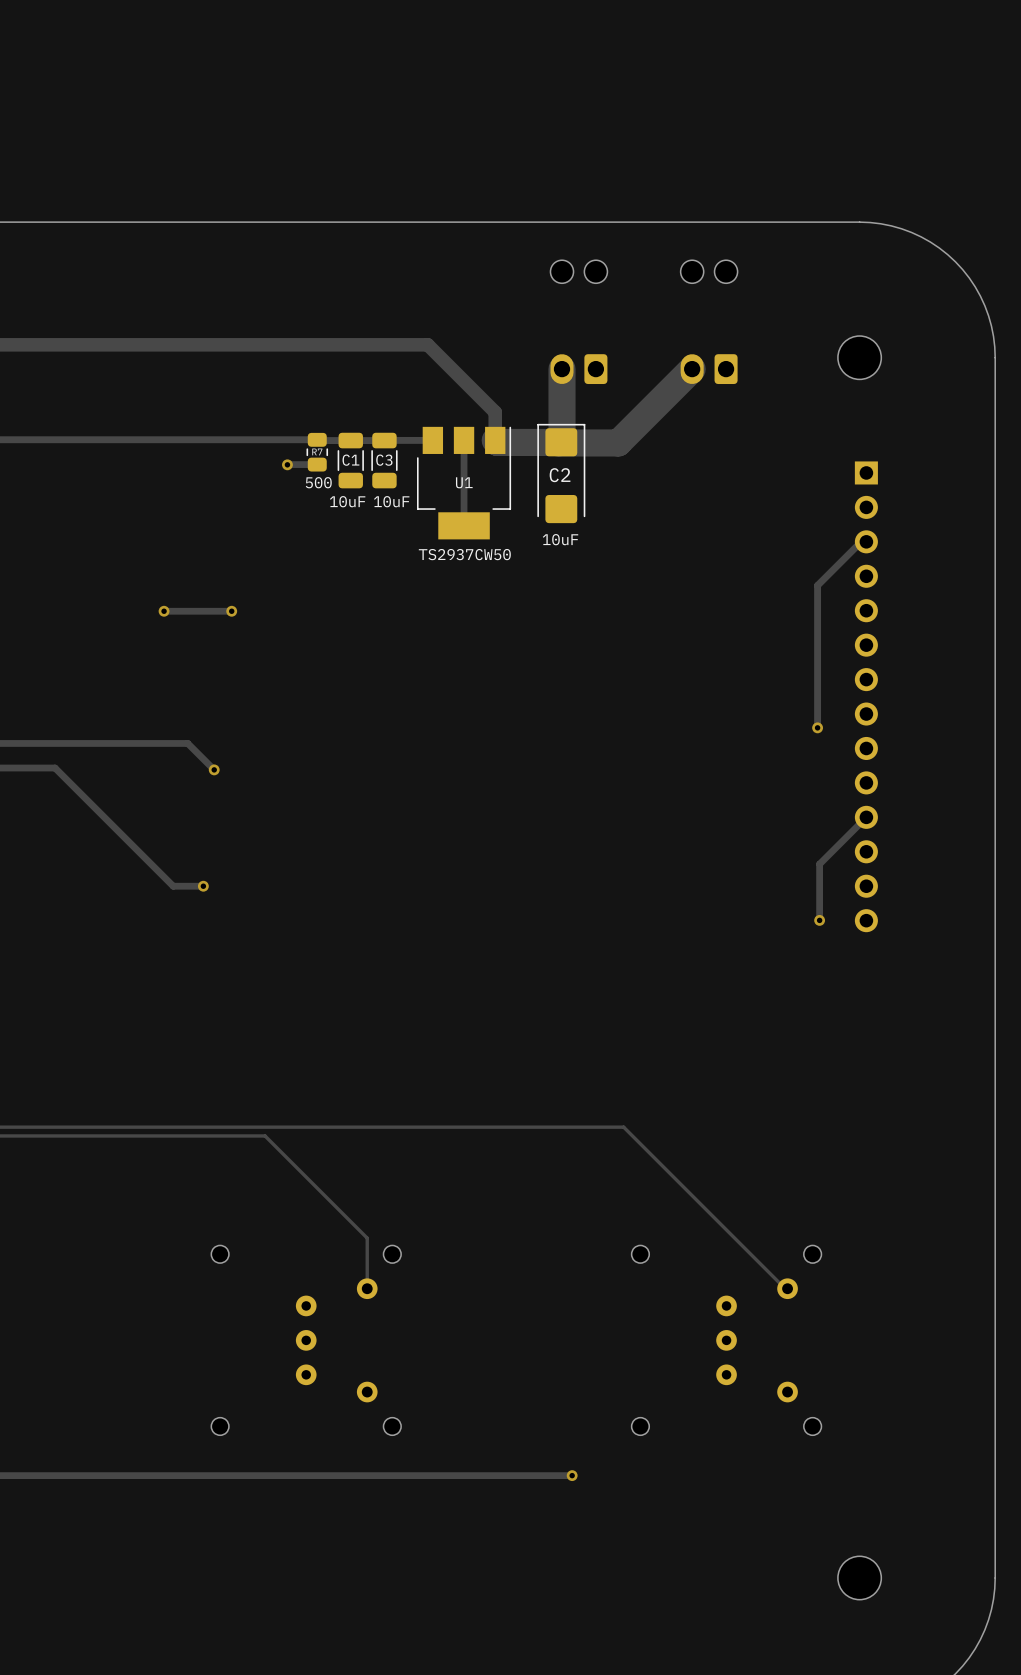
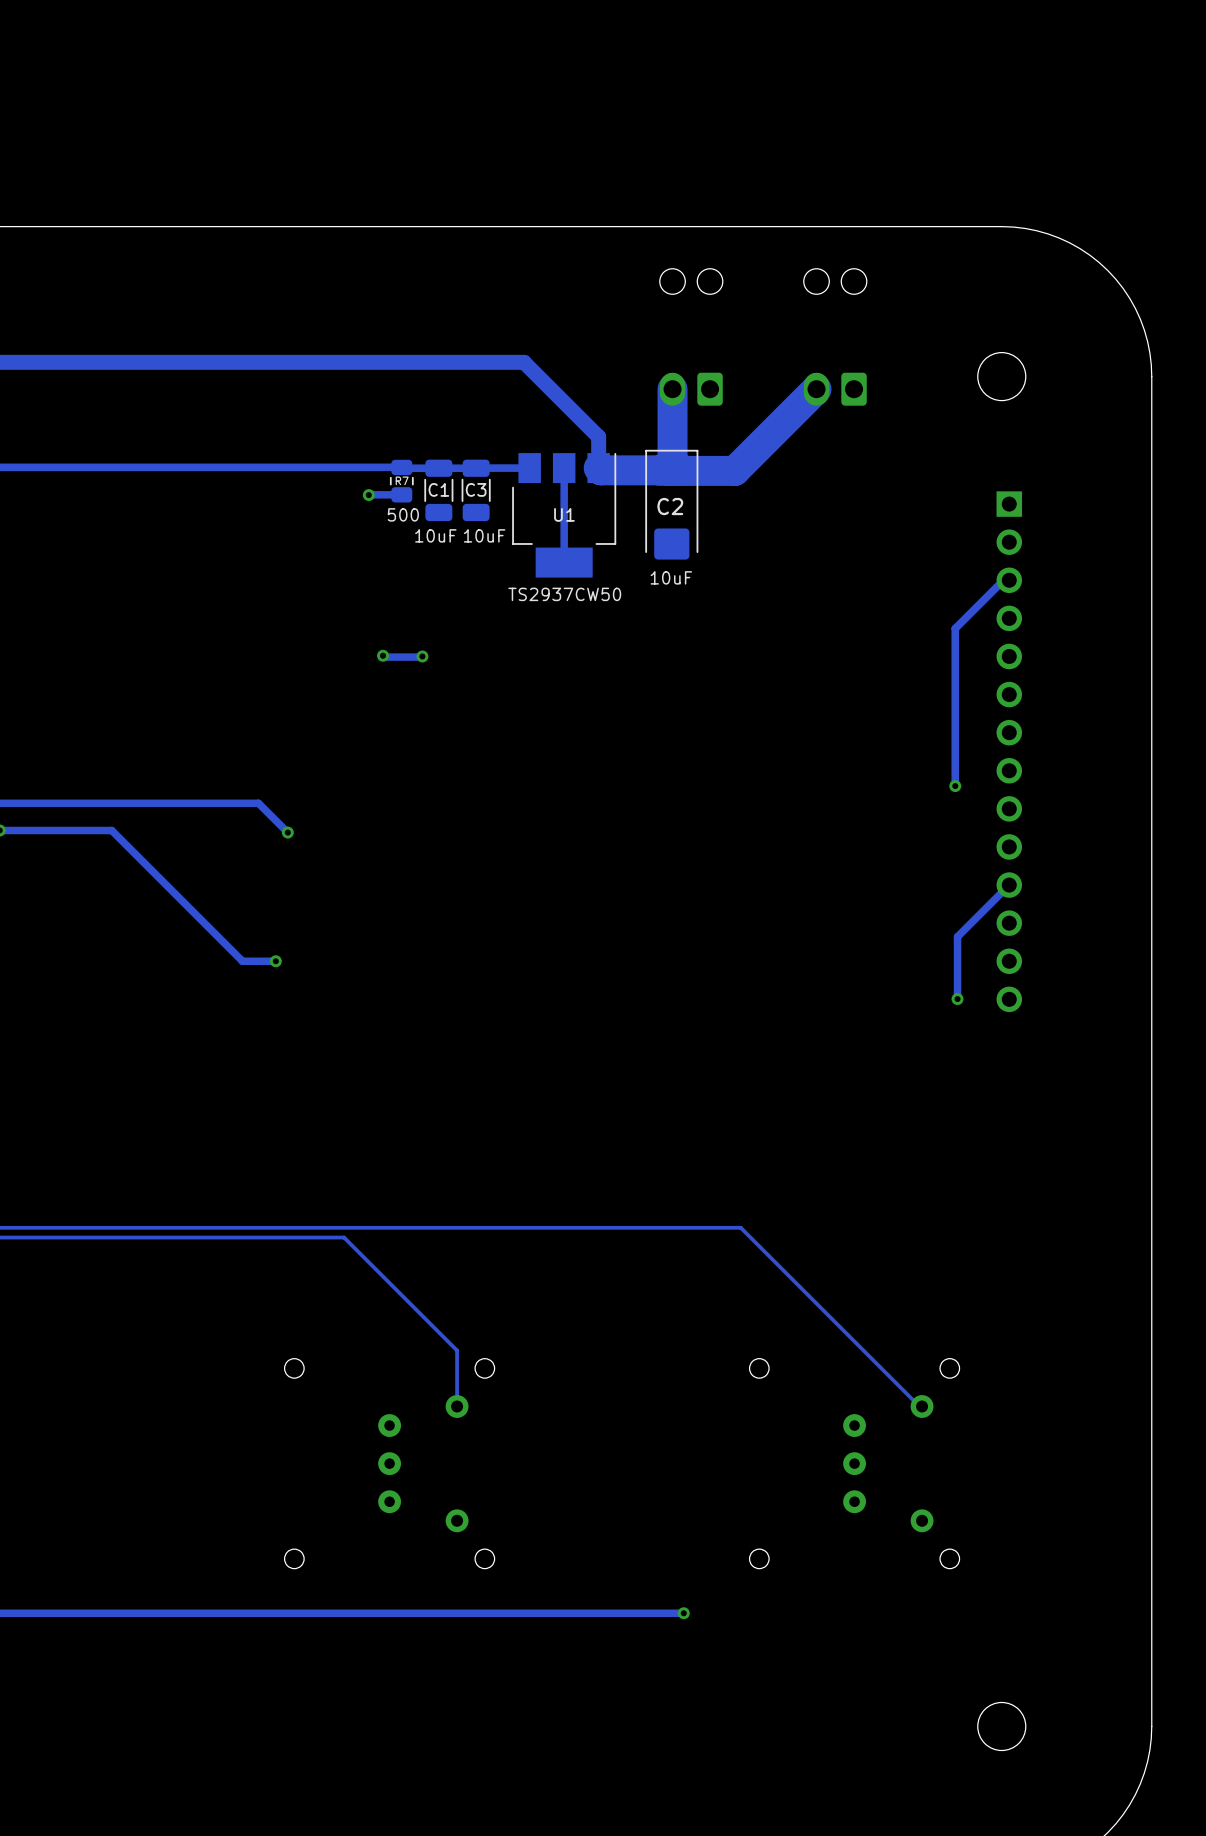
track: none -> (383, 655) (422, 656)
via: none -> (383, 655)
via: none -> (422, 656)
via: (164, 611) -> none
track: (231, 611) (164, 611) -> none
via: (231, 611) -> none

